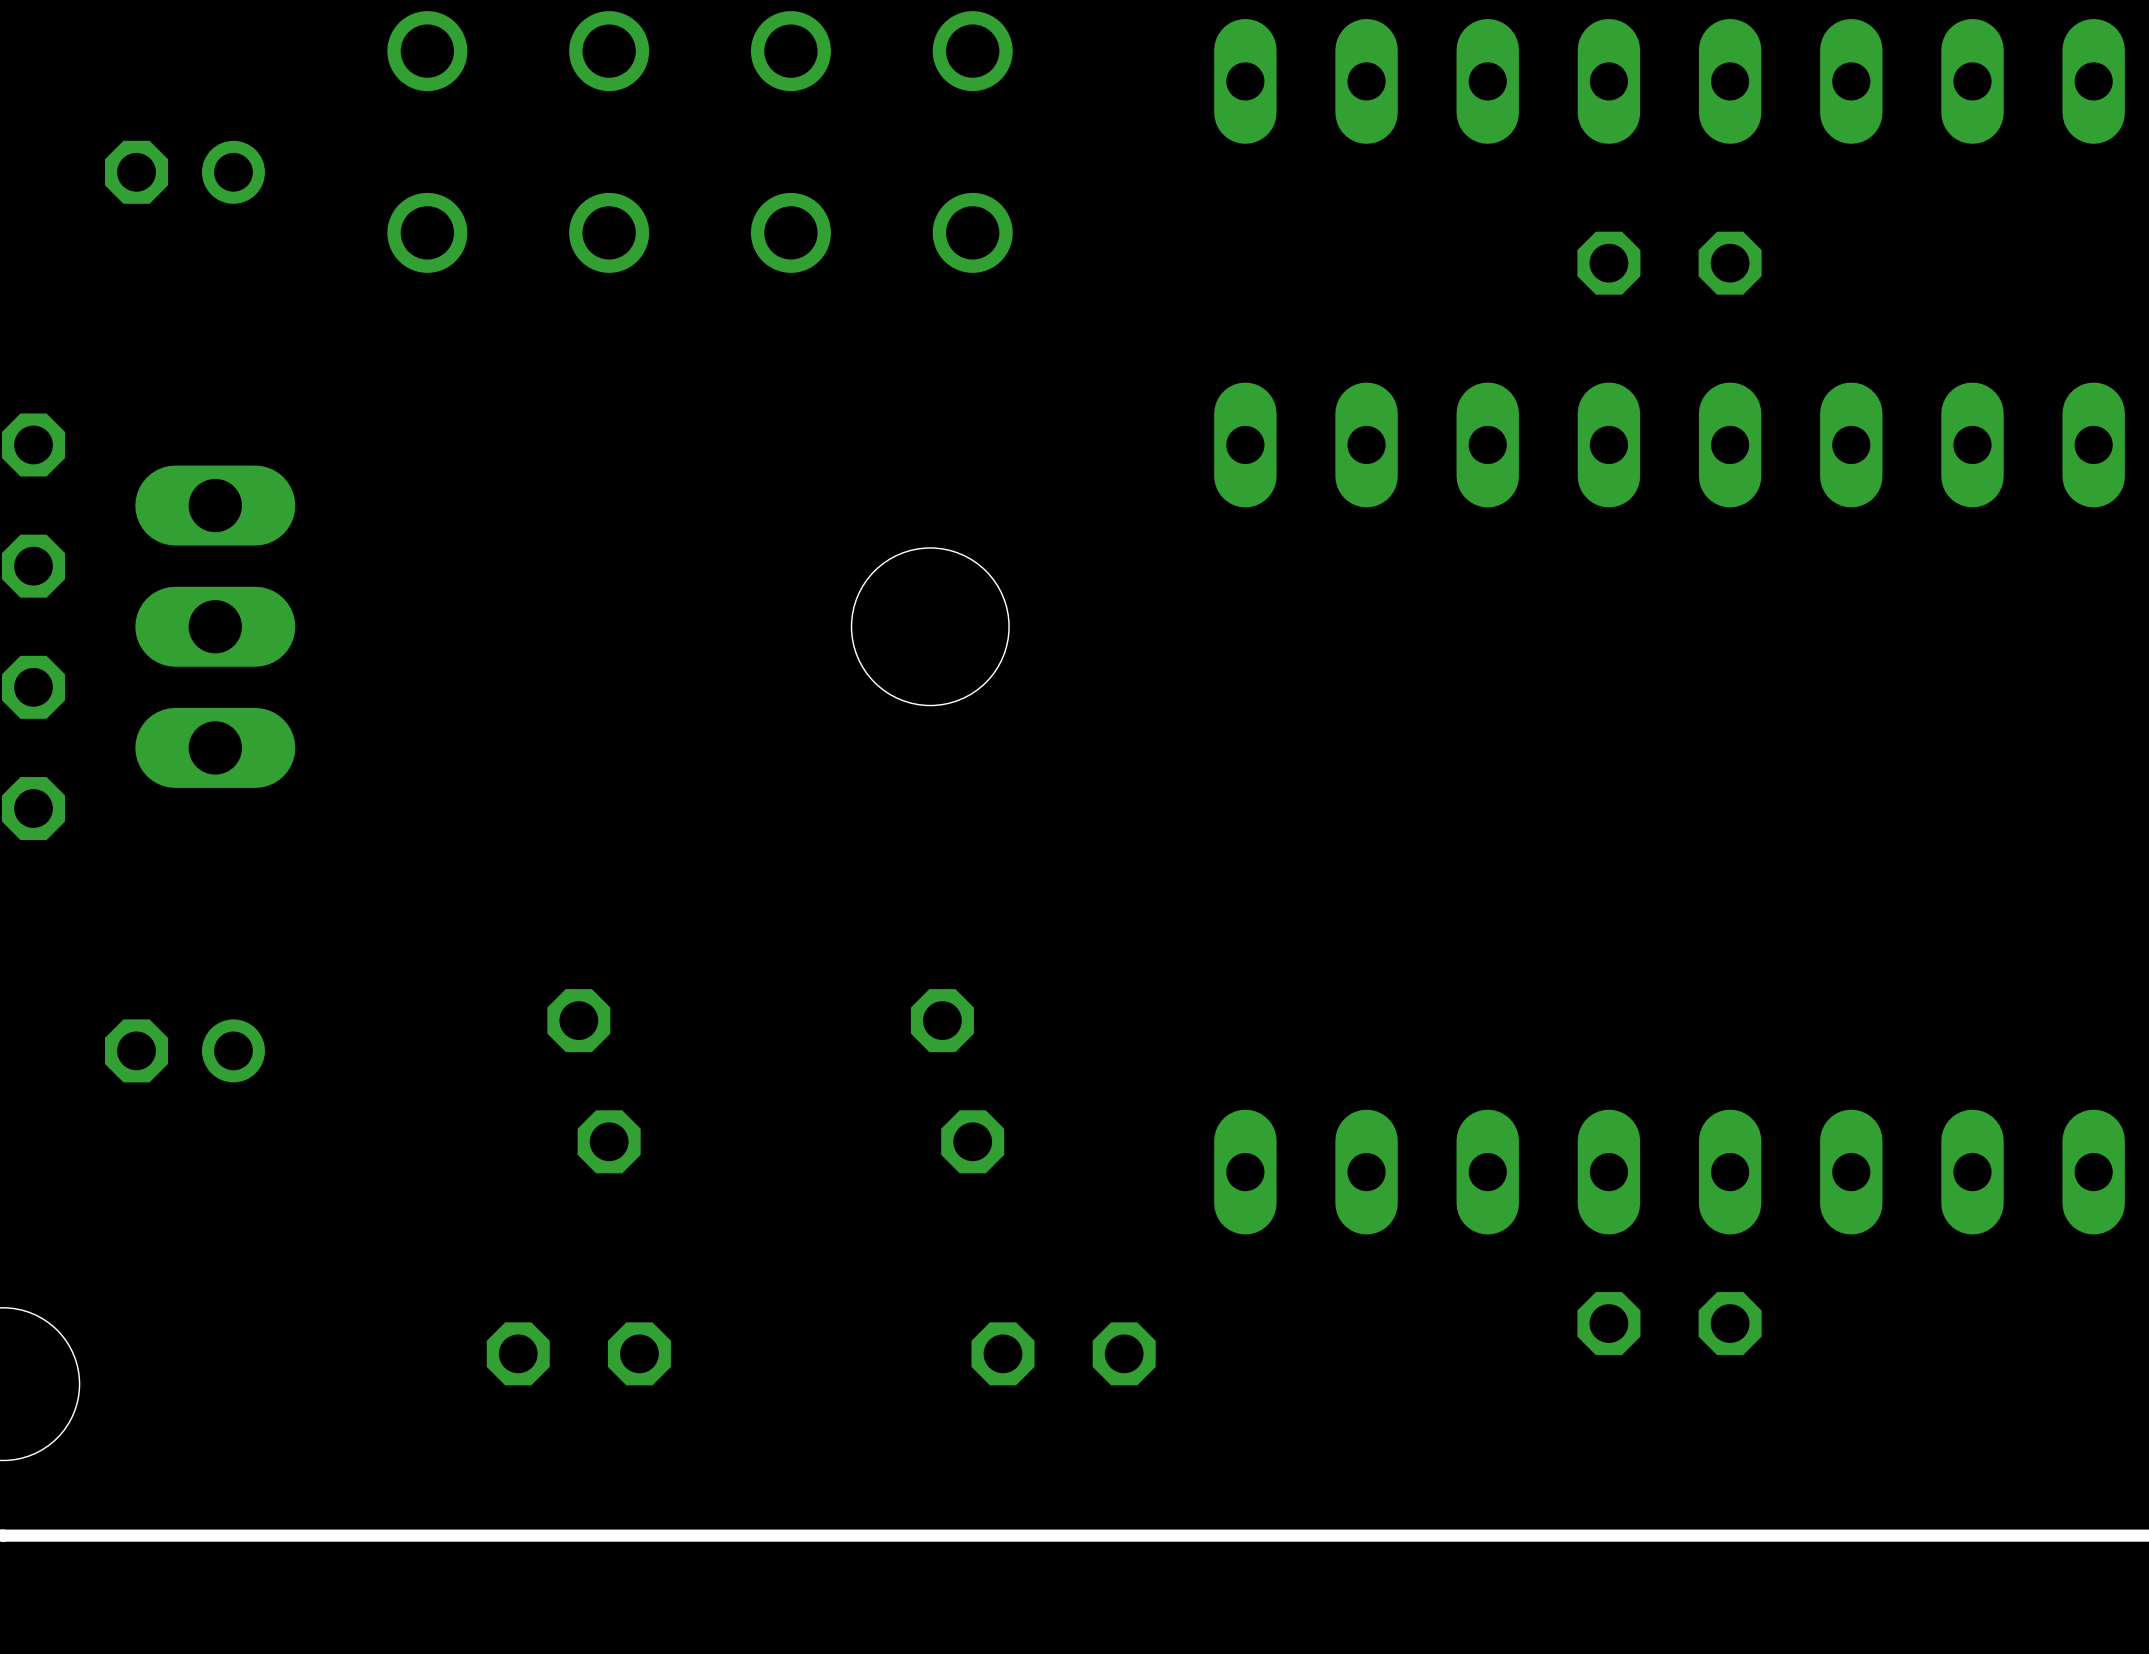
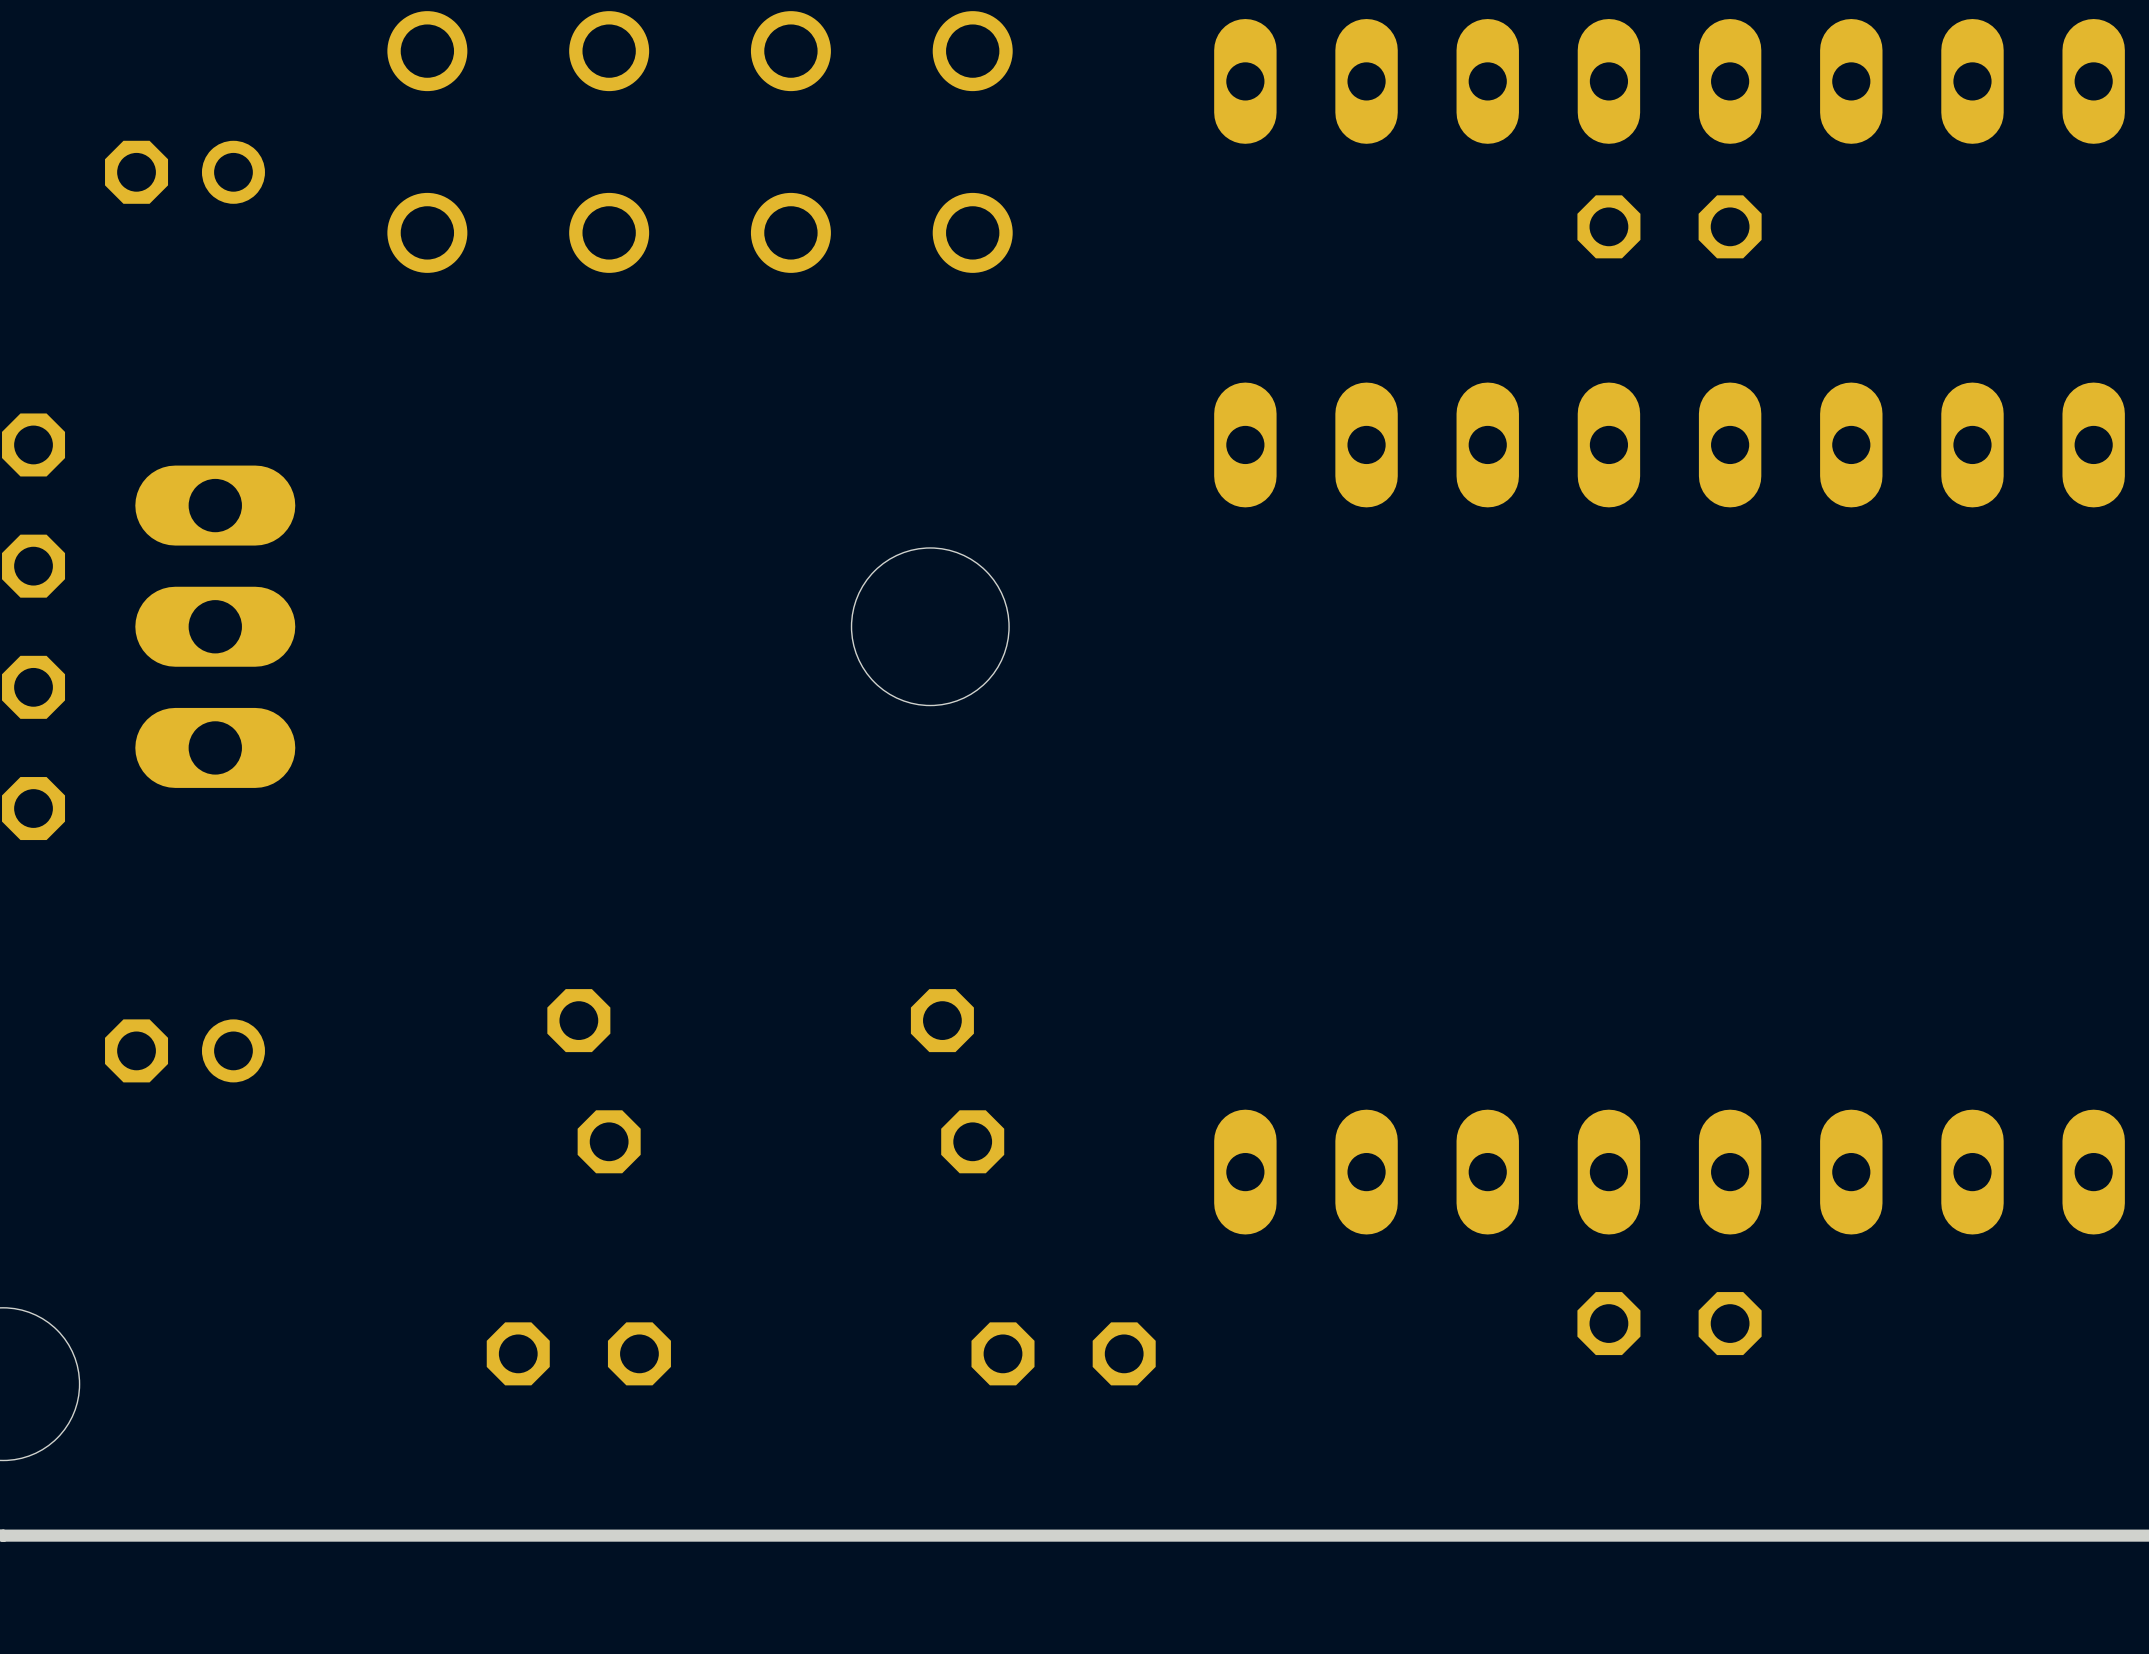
part position: (1669, 263) -> (1669, 226)

